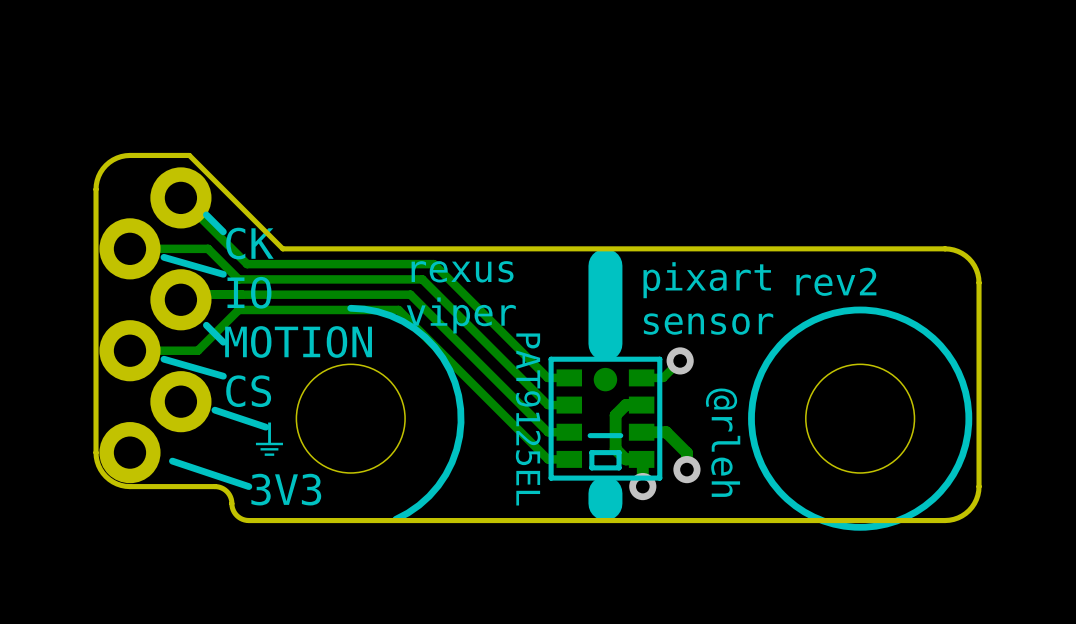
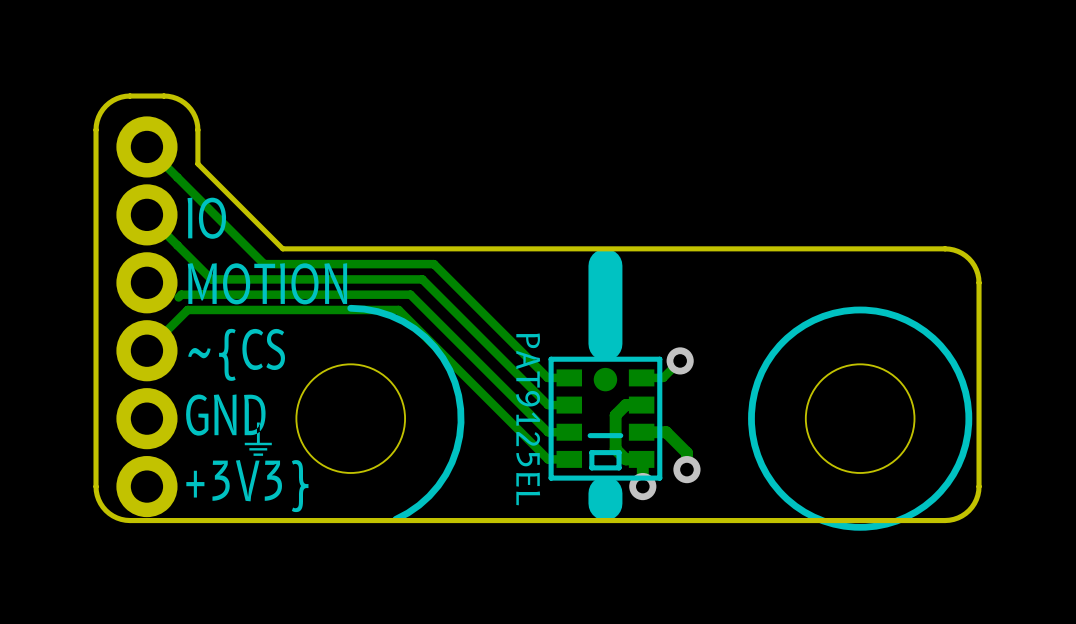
board edge: (197, 163) (189, 155) (121, 156) (109, 162) (103, 168) (97, 180) (96, 189) -> (197, 163) (196, 121) (190, 109) (184, 103) (168, 96) (121, 97) (105, 105) (97, 121) (96, 189)
part footprint: [99, 167, 212, 484] -> [116, 116, 178, 518]
track: (180, 197) (247, 264) (264, 264) -> (146, 146) (264, 264)
line: (206, 214) (223, 231) -> none
text: CK (249, 243) -> none
track: (129, 248) (208, 248) (238, 279) -> (146, 214) (211, 279) (238, 279)
line: (163, 257) (223, 274) -> none
text: rexus (462, 271) -> none
text: pixart (707, 280) -> none
text: rev2 (836, 281) -> none
text position: IO (249, 292) -> IO (206, 218)
track: (238, 309) (197, 350) (129, 350) -> (238, 309) (187, 309) (146, 350)
text: viper (461, 315) -> none
text: sensor (708, 324) -> none
line: (206, 325) (223, 342) -> none
text position: MOTION (298, 341) -> MOTION (267, 283)
line: (163, 359) (223, 376) -> none
text: CS (248, 391) -> ~{CS (236, 354)
line: (214, 410) (265, 427) -> none
text: none -> GND (225, 415)
text: @rleh (723, 442) -> none
board edge: (96, 452) (97, 461) (103, 473) (116, 483) (129, 486) (219, 487) (229, 495) (233, 510) (236, 515) (248, 520) -> (96, 452) (97, 495) (103, 507) (116, 517) (129, 520) (248, 520)
line: (172, 461) (248, 486) -> none
text: 3V3 (286, 489) -> +3V3} (247, 486)

